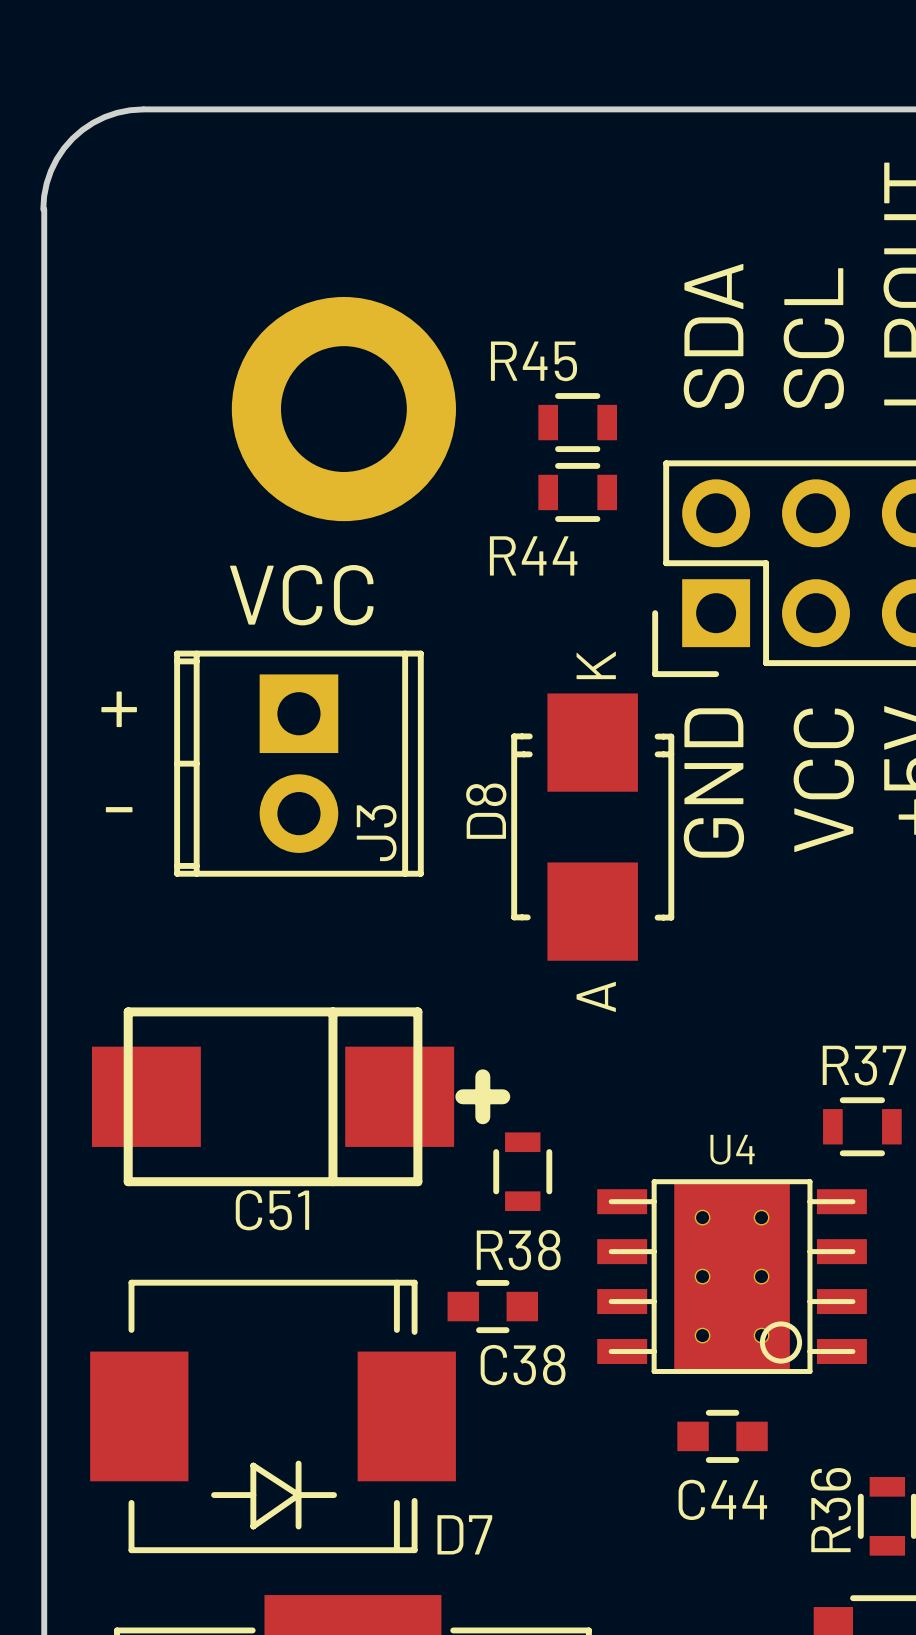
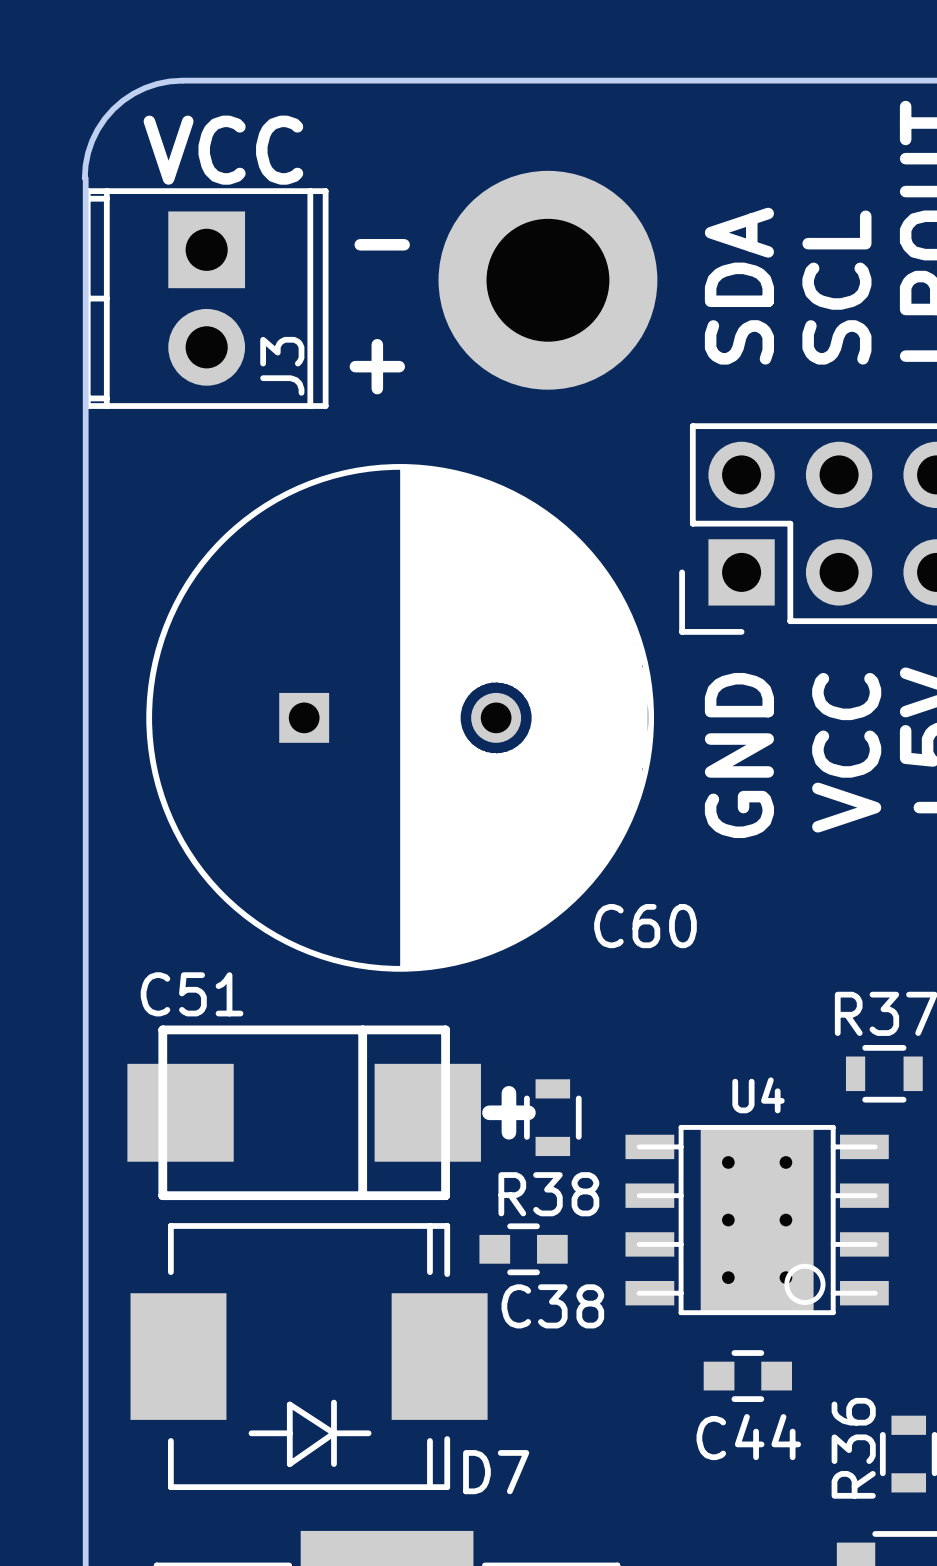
part position: (343, 409) -> (547, 280)
R45: (577, 422) -> none
R44: (577, 492) -> none
text position: VCC (301, 595) -> VCC (223, 150)
text position: + (119, 709) -> + (377, 366)
C60: none -> (400, 717)
J3 position: (298, 763) -> (206, 298)
text position: - (119, 809) -> - (382, 244)
D8: (592, 827) -> none
C51 position: (301, 1096) -> (331, 1112)
C51 name position: C51 (272, 1210) -> C51 (192, 994)

